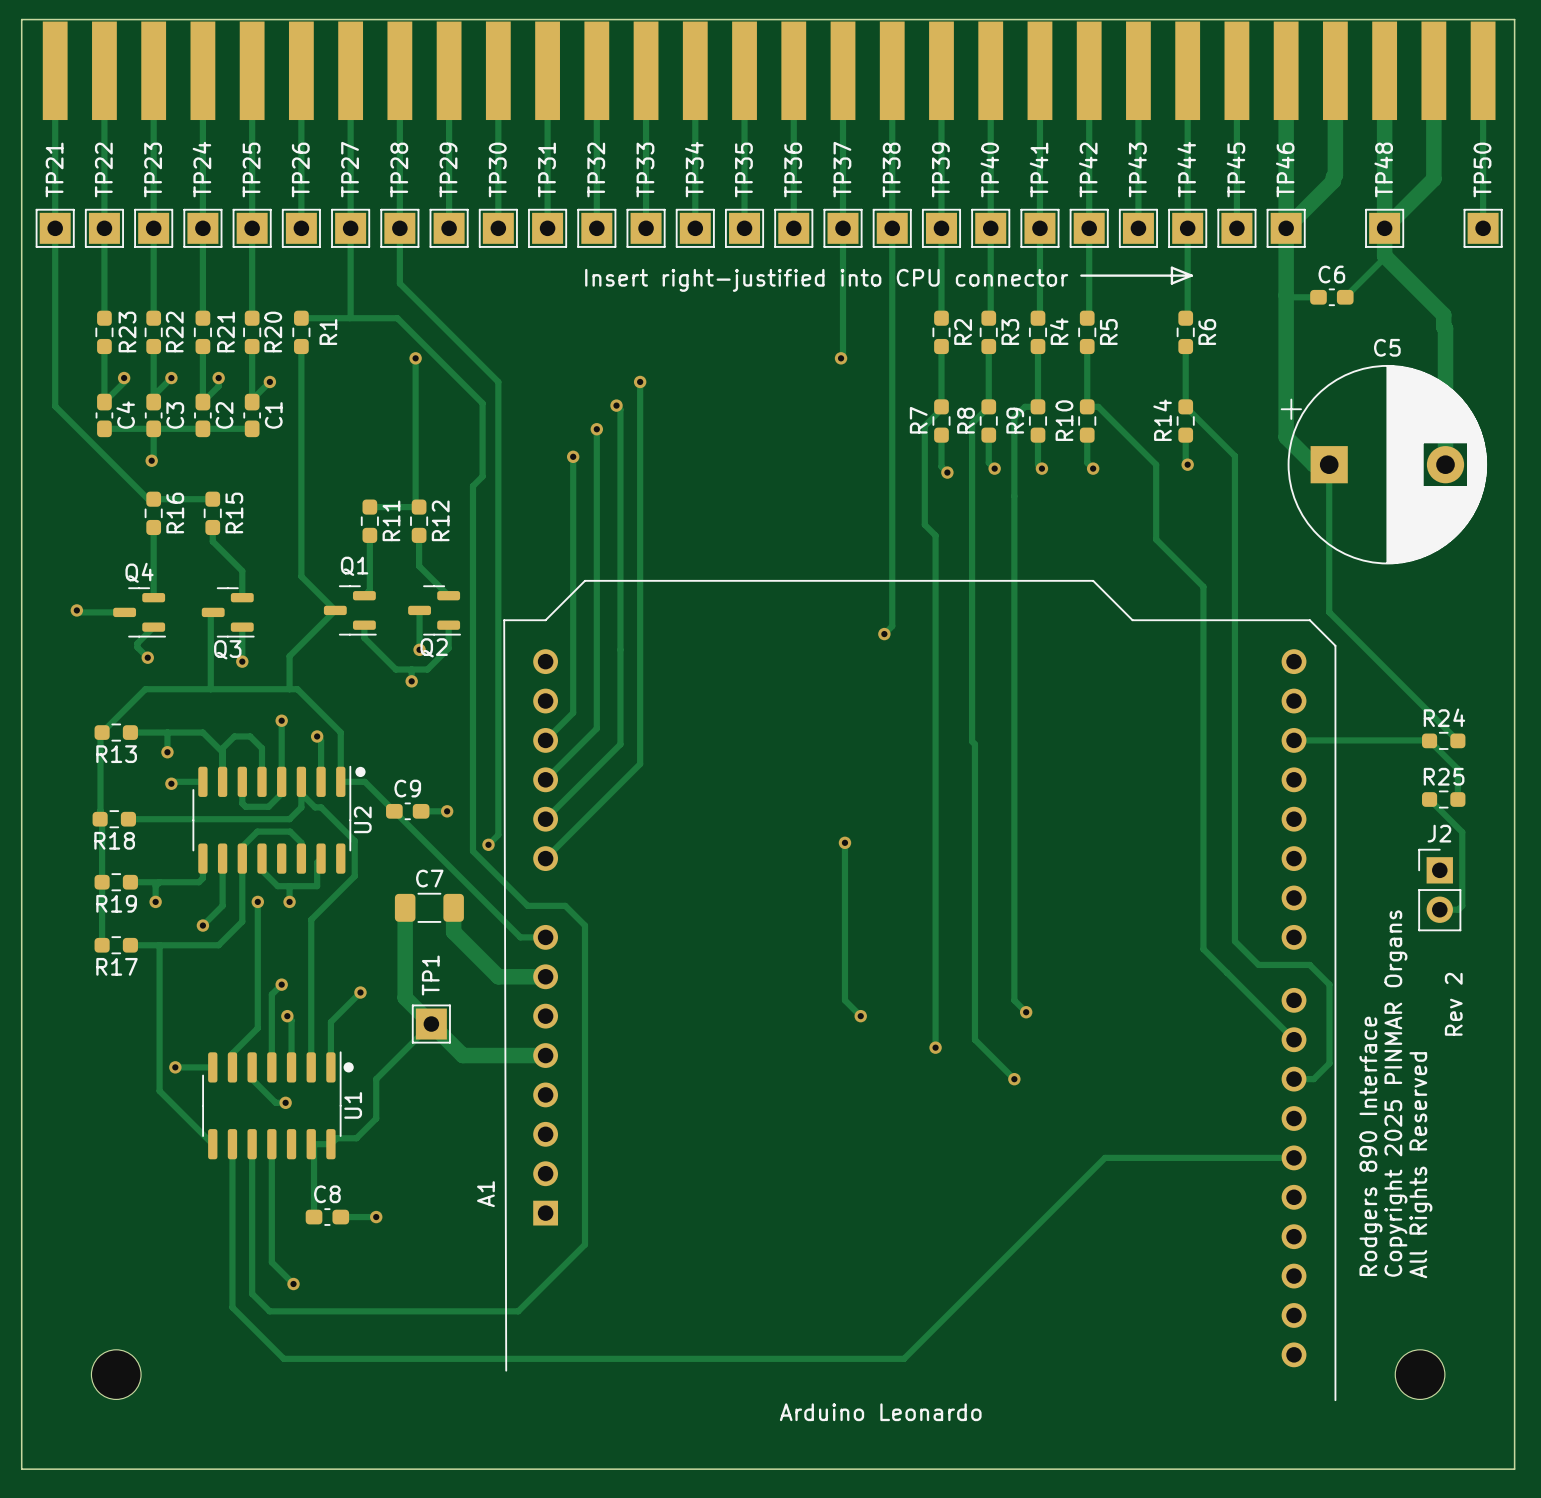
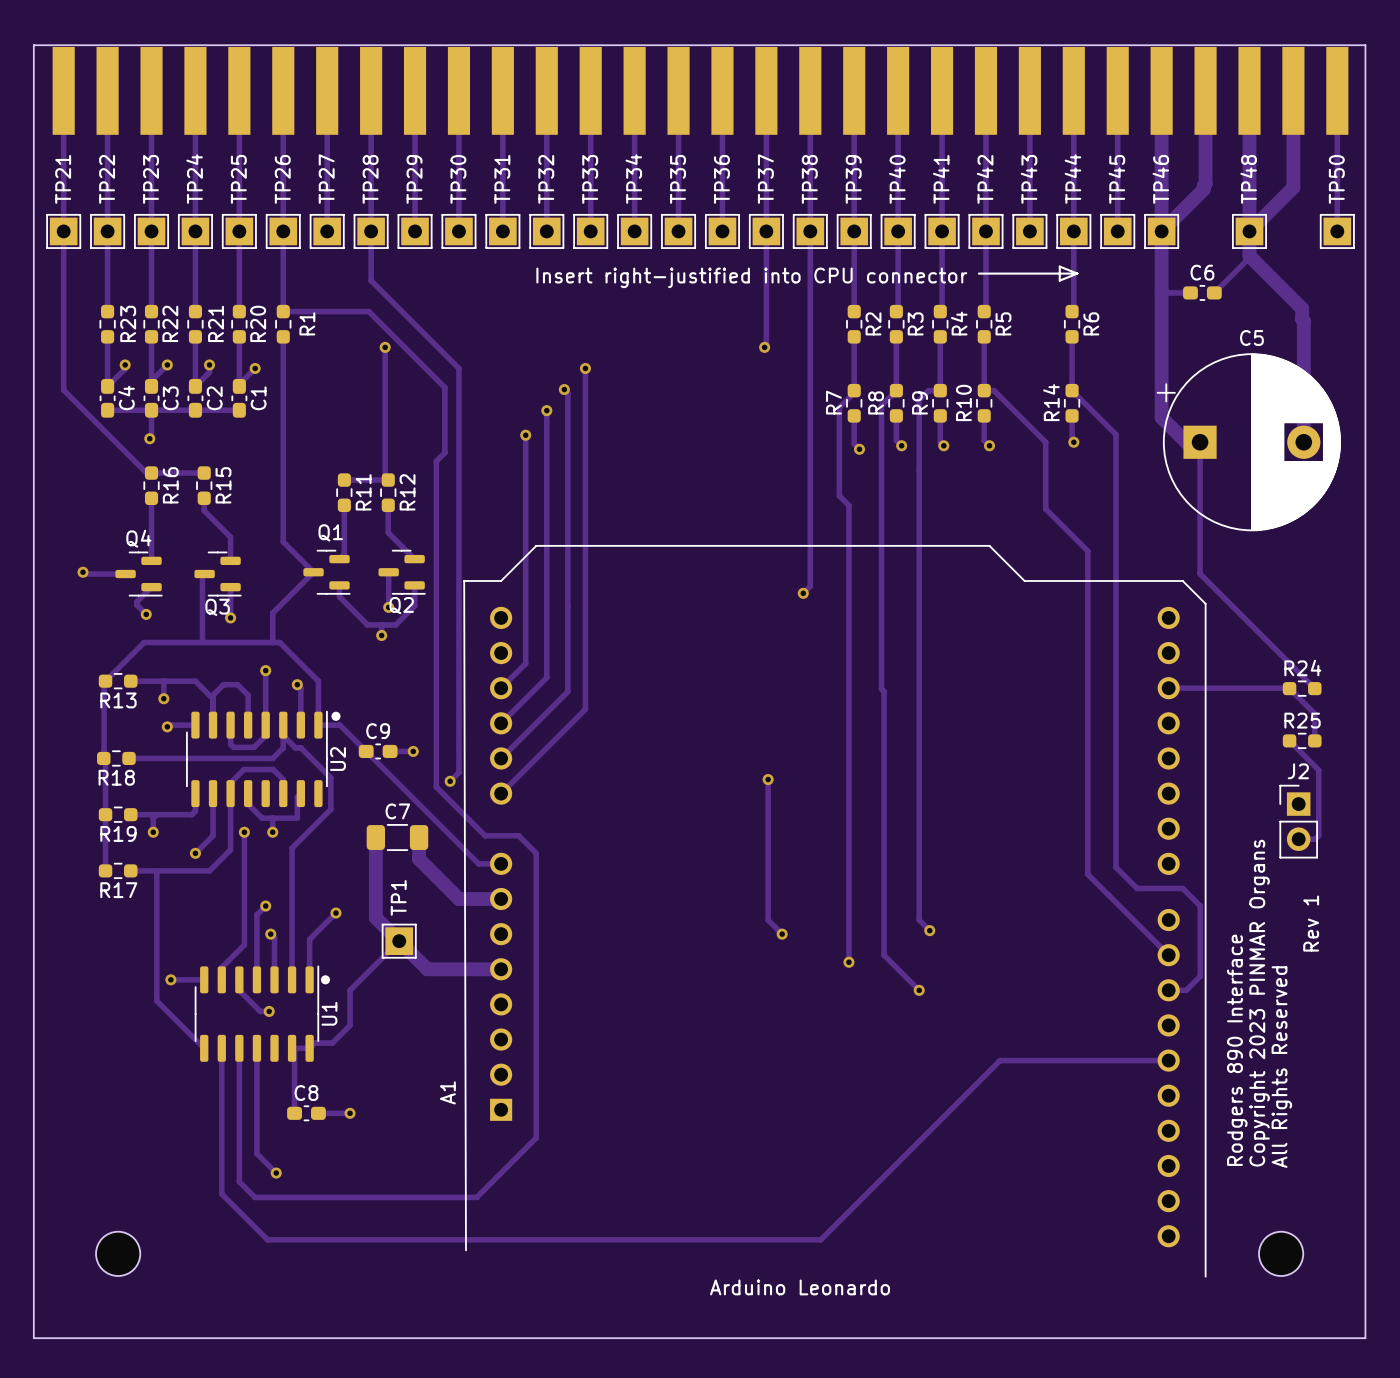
track: none -> (283, 231) (283, 311)
track: (350, 228) (349, 318) -> none
text: Rev 2 (1453, 1004) -> Rev 1 (1311, 923)
text: Copyright 2025 PINMAR Organs (1395, 1093) -> Copyright 2023 PINMAR Organs (1259, 1003)

